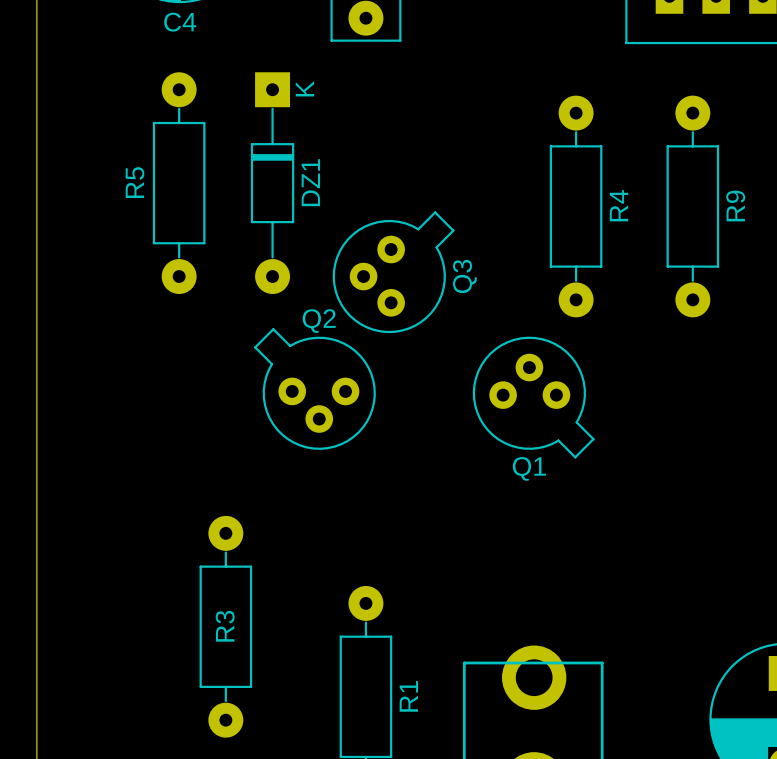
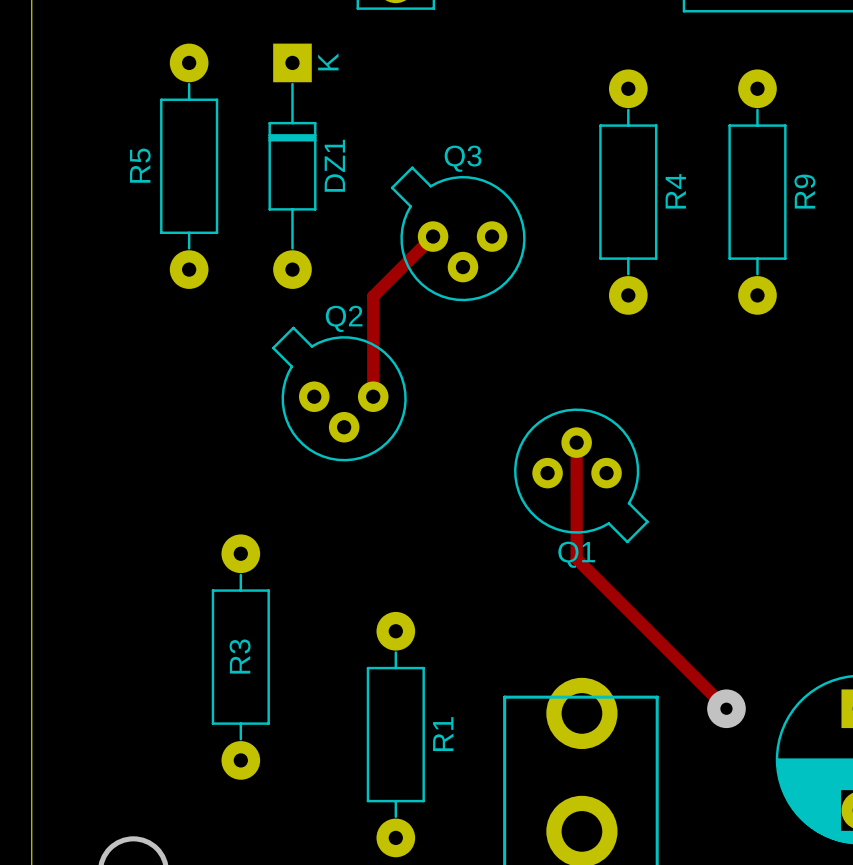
track: none -> (433, 236) (373, 296) (373, 396)
Q3 rotation: 0° (393, 272) -> 90° counterclockwise (458, 233)
Q1 position: (533, 397) -> (581, 475)
track: none -> (576, 442) (576, 558) (726, 708)
via: none -> (726, 708)

